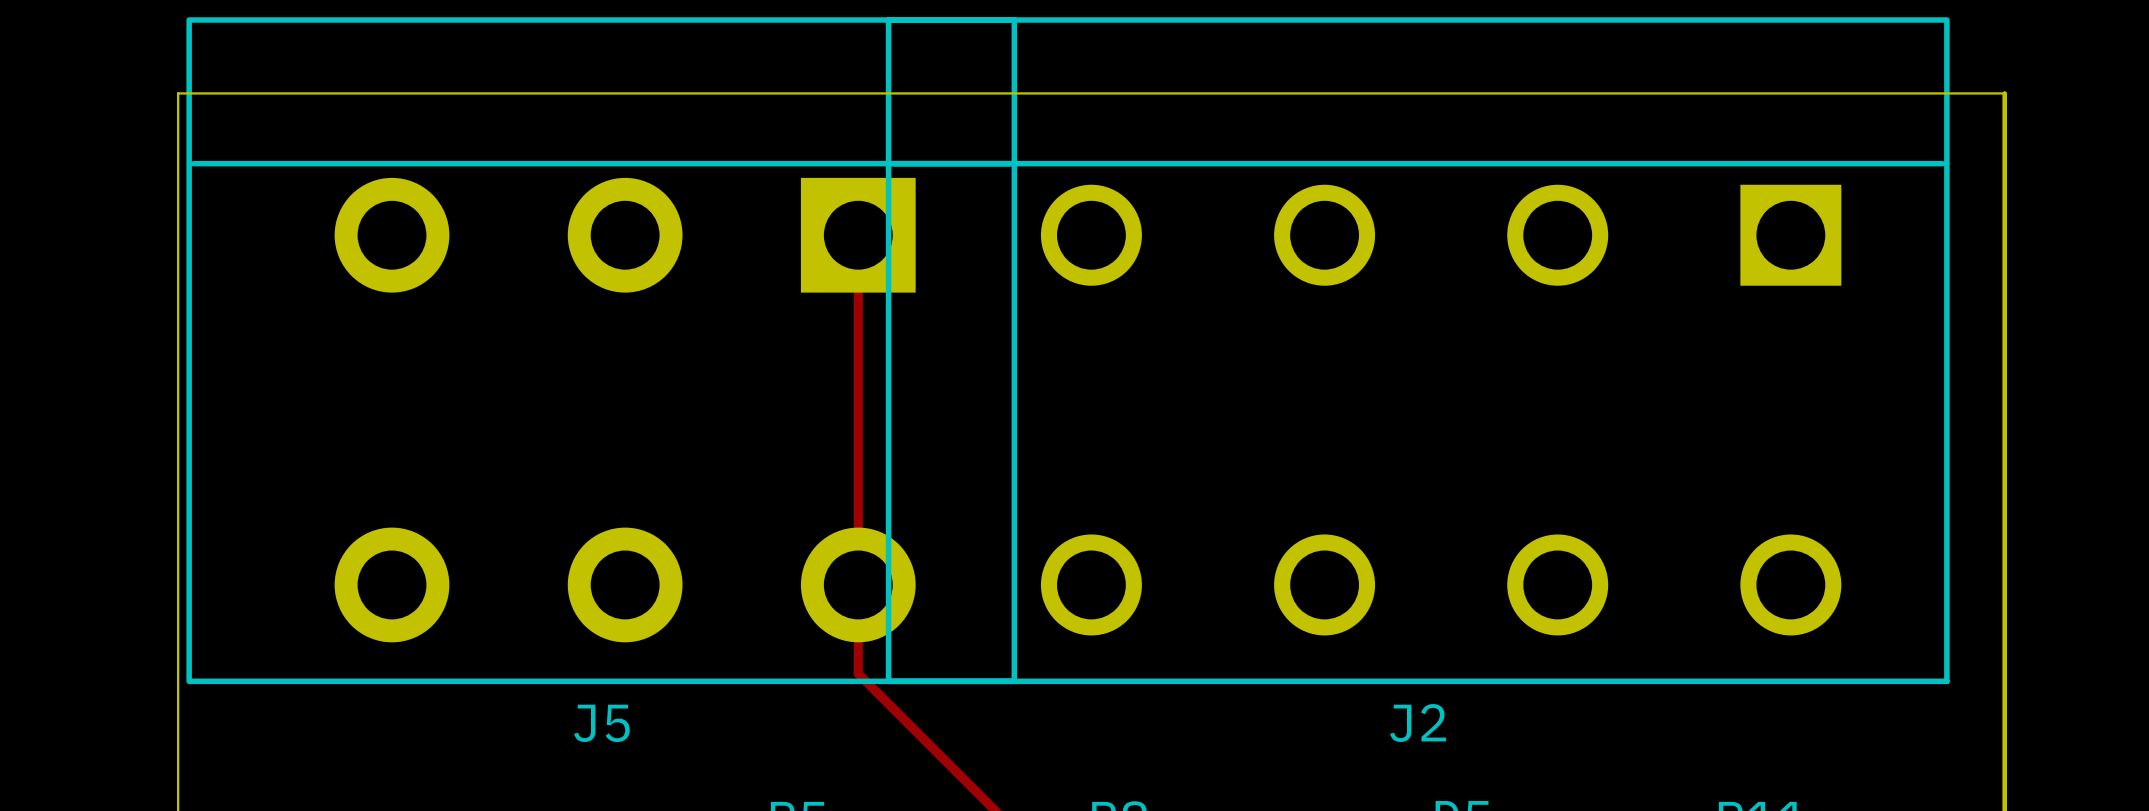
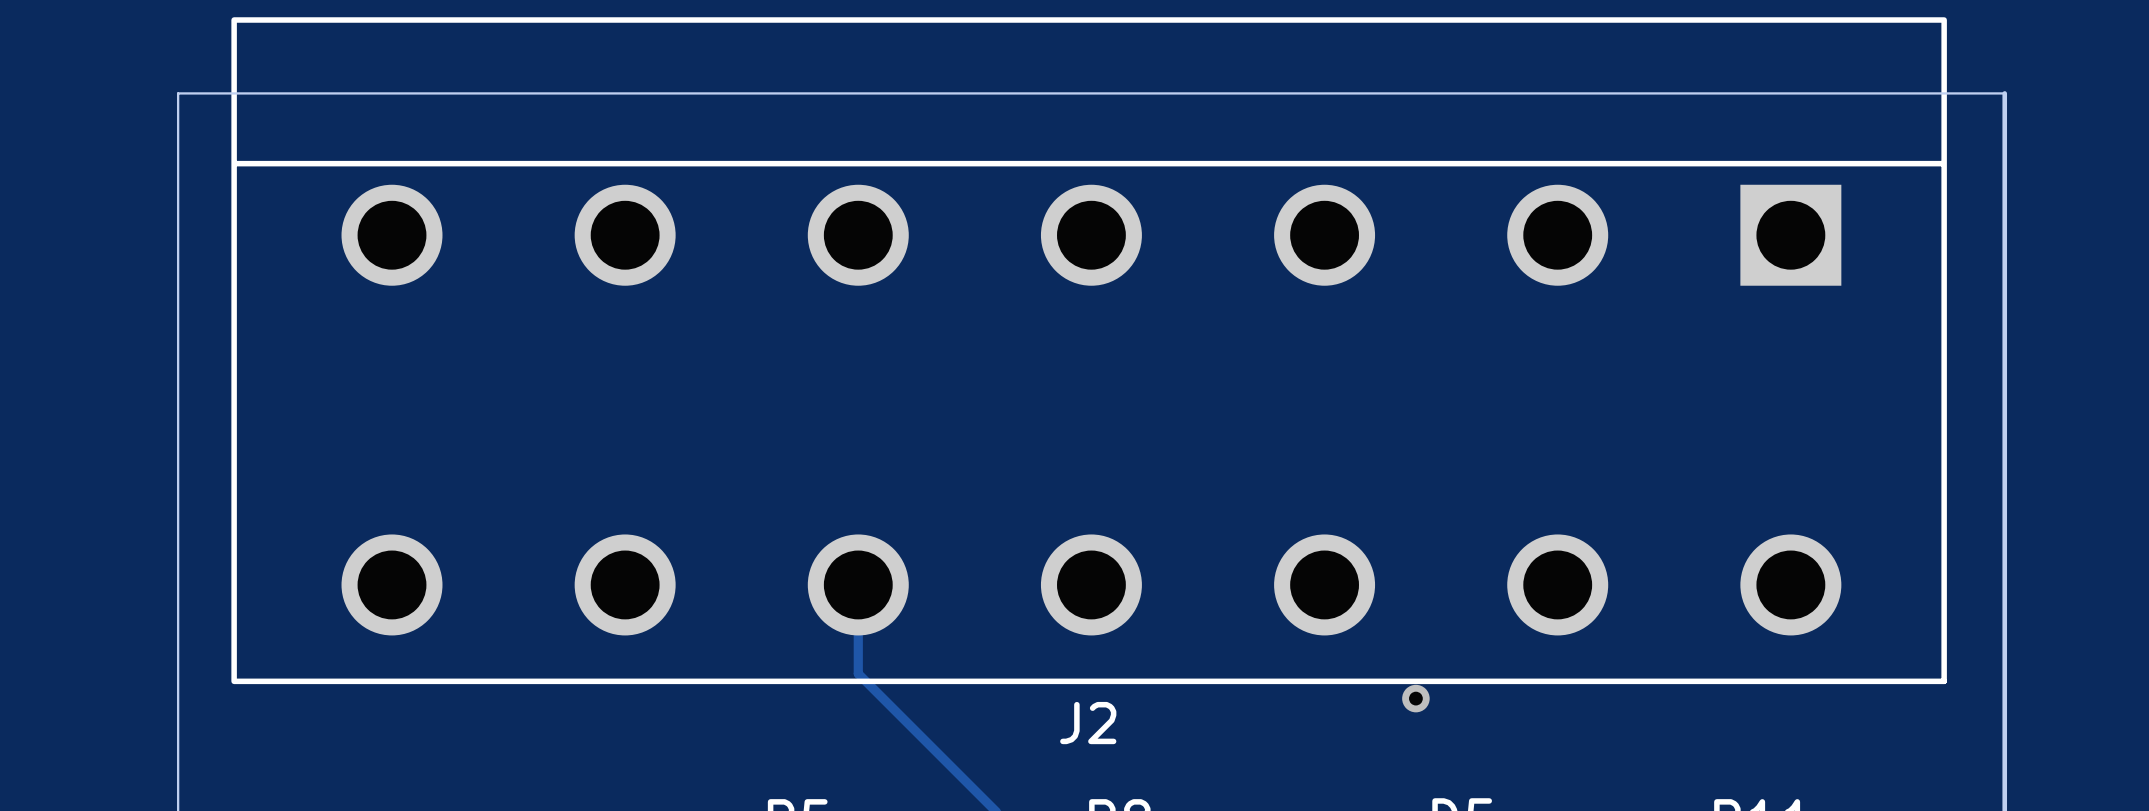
J2 footprint: [885, 17, 1950, 685] -> [231, 17, 1947, 685]
track: (858, 235) (858, 584) -> none
J5: (601, 350) -> none
via: none -> (1415, 698)

